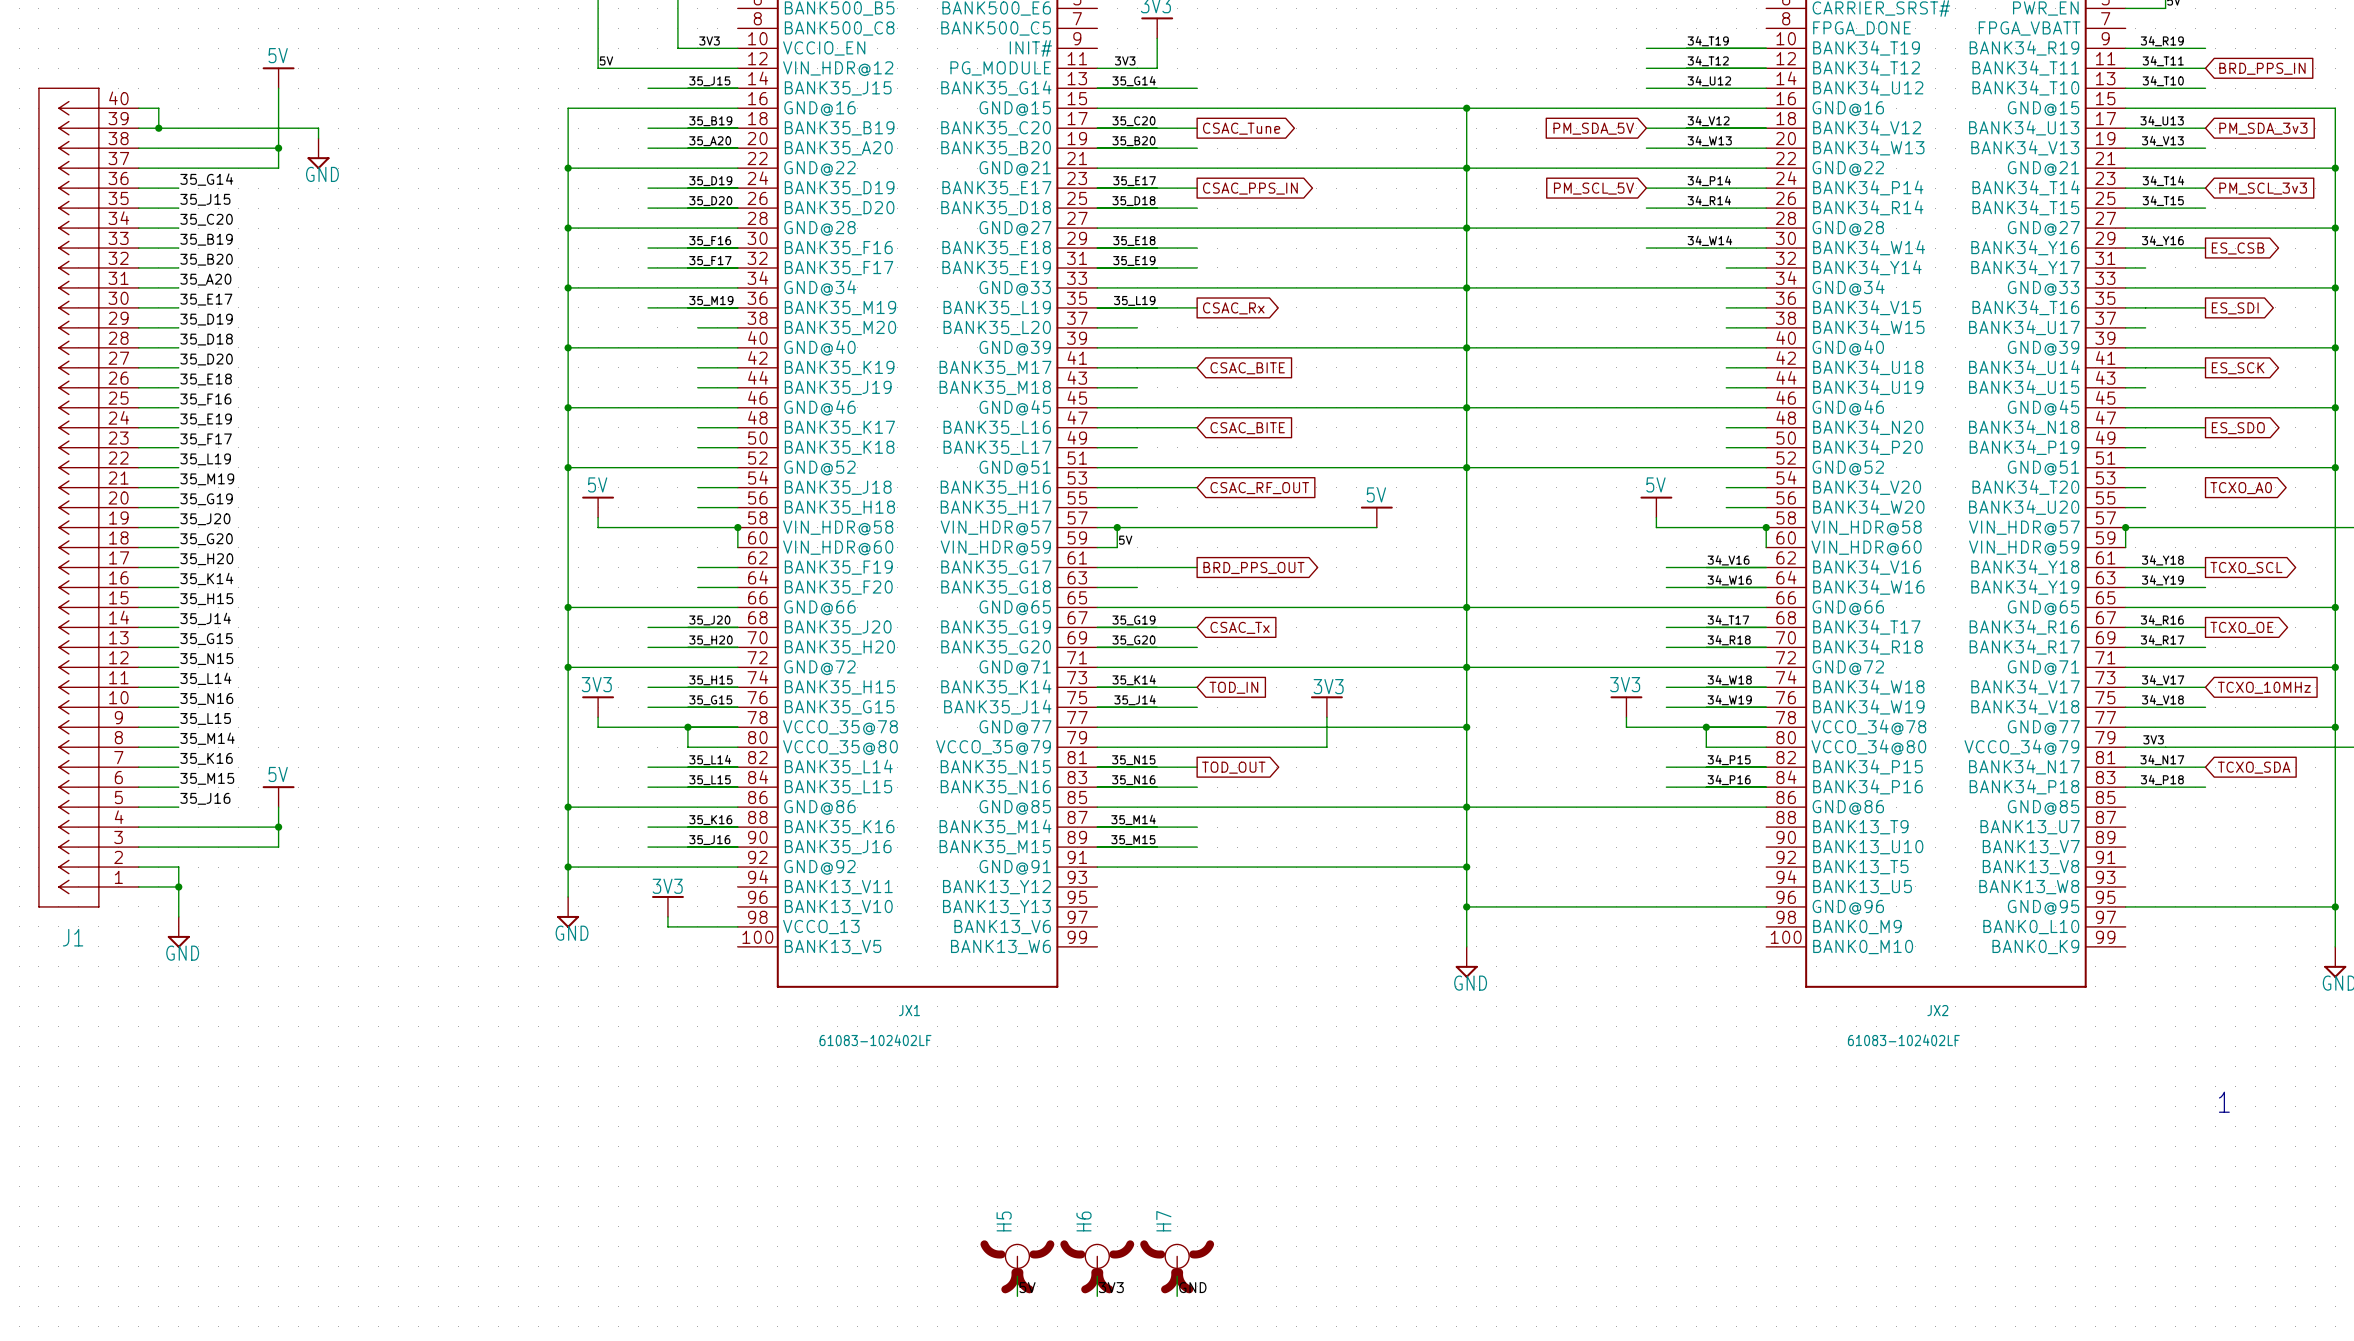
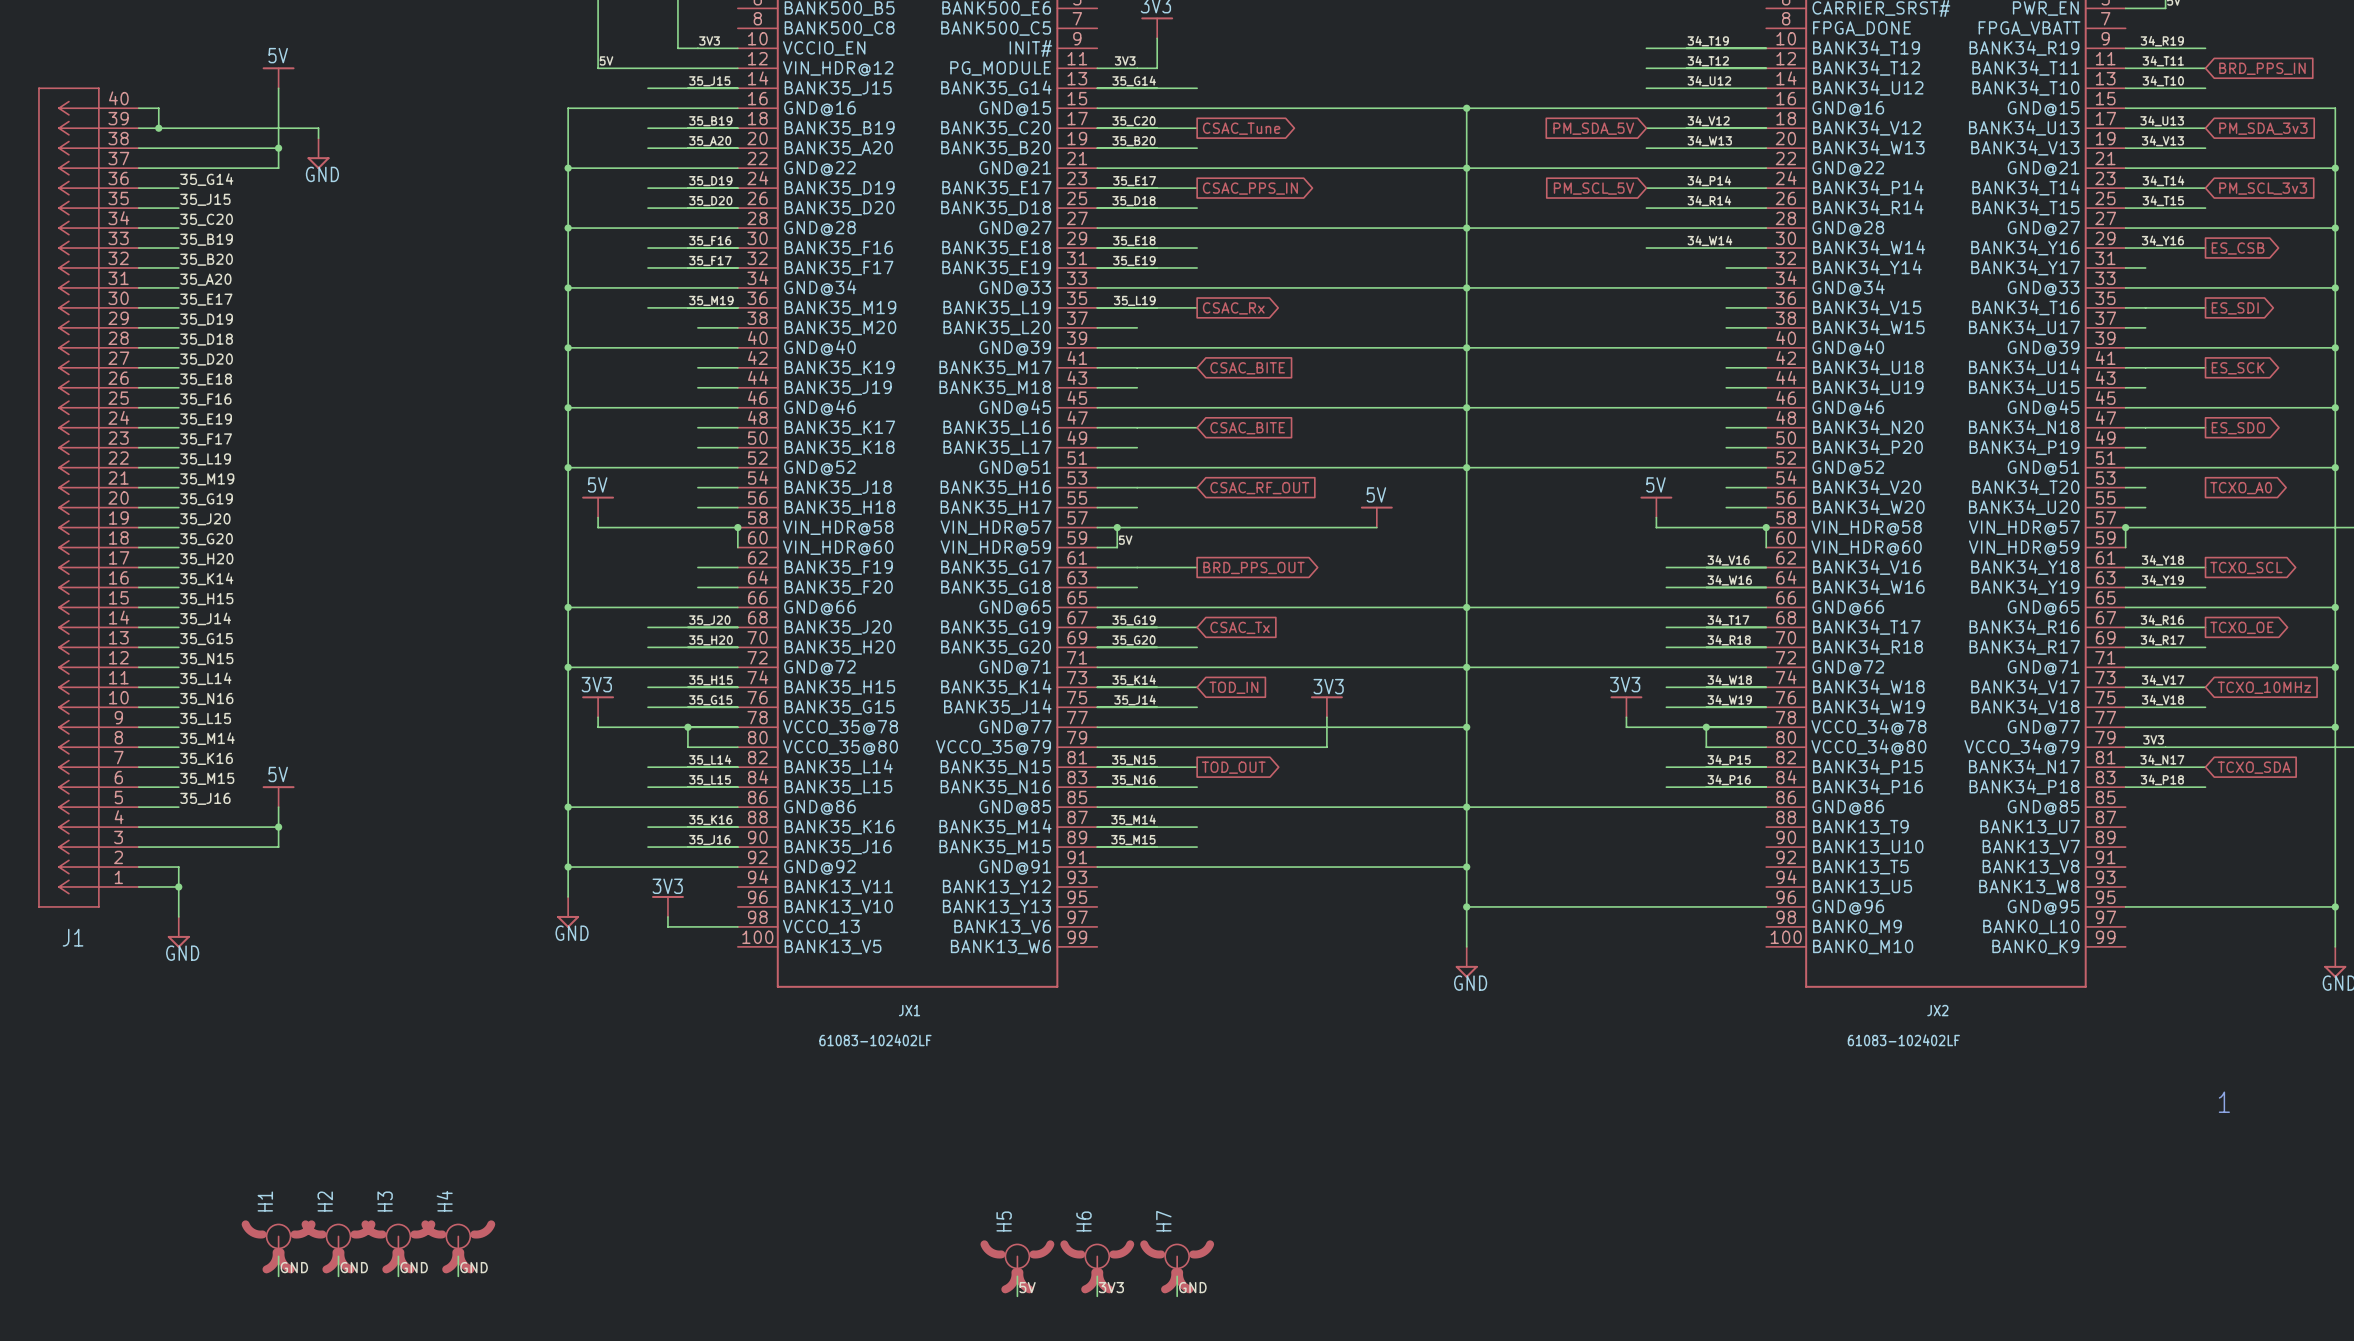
H1: none -> (278, 1246)
H2: none -> (338, 1246)
H3: none -> (398, 1246)
H4: none -> (458, 1246)
wire: none -> (278, 1256) (278, 1276)
wire: none -> (338, 1256) (338, 1276)
wire: none -> (398, 1256) (398, 1276)
wire: none -> (458, 1256) (458, 1276)
label: none -> GND (294, 1267)
label: none -> GND (354, 1267)
label: none -> GND (414, 1267)
label: none -> GND (474, 1267)

